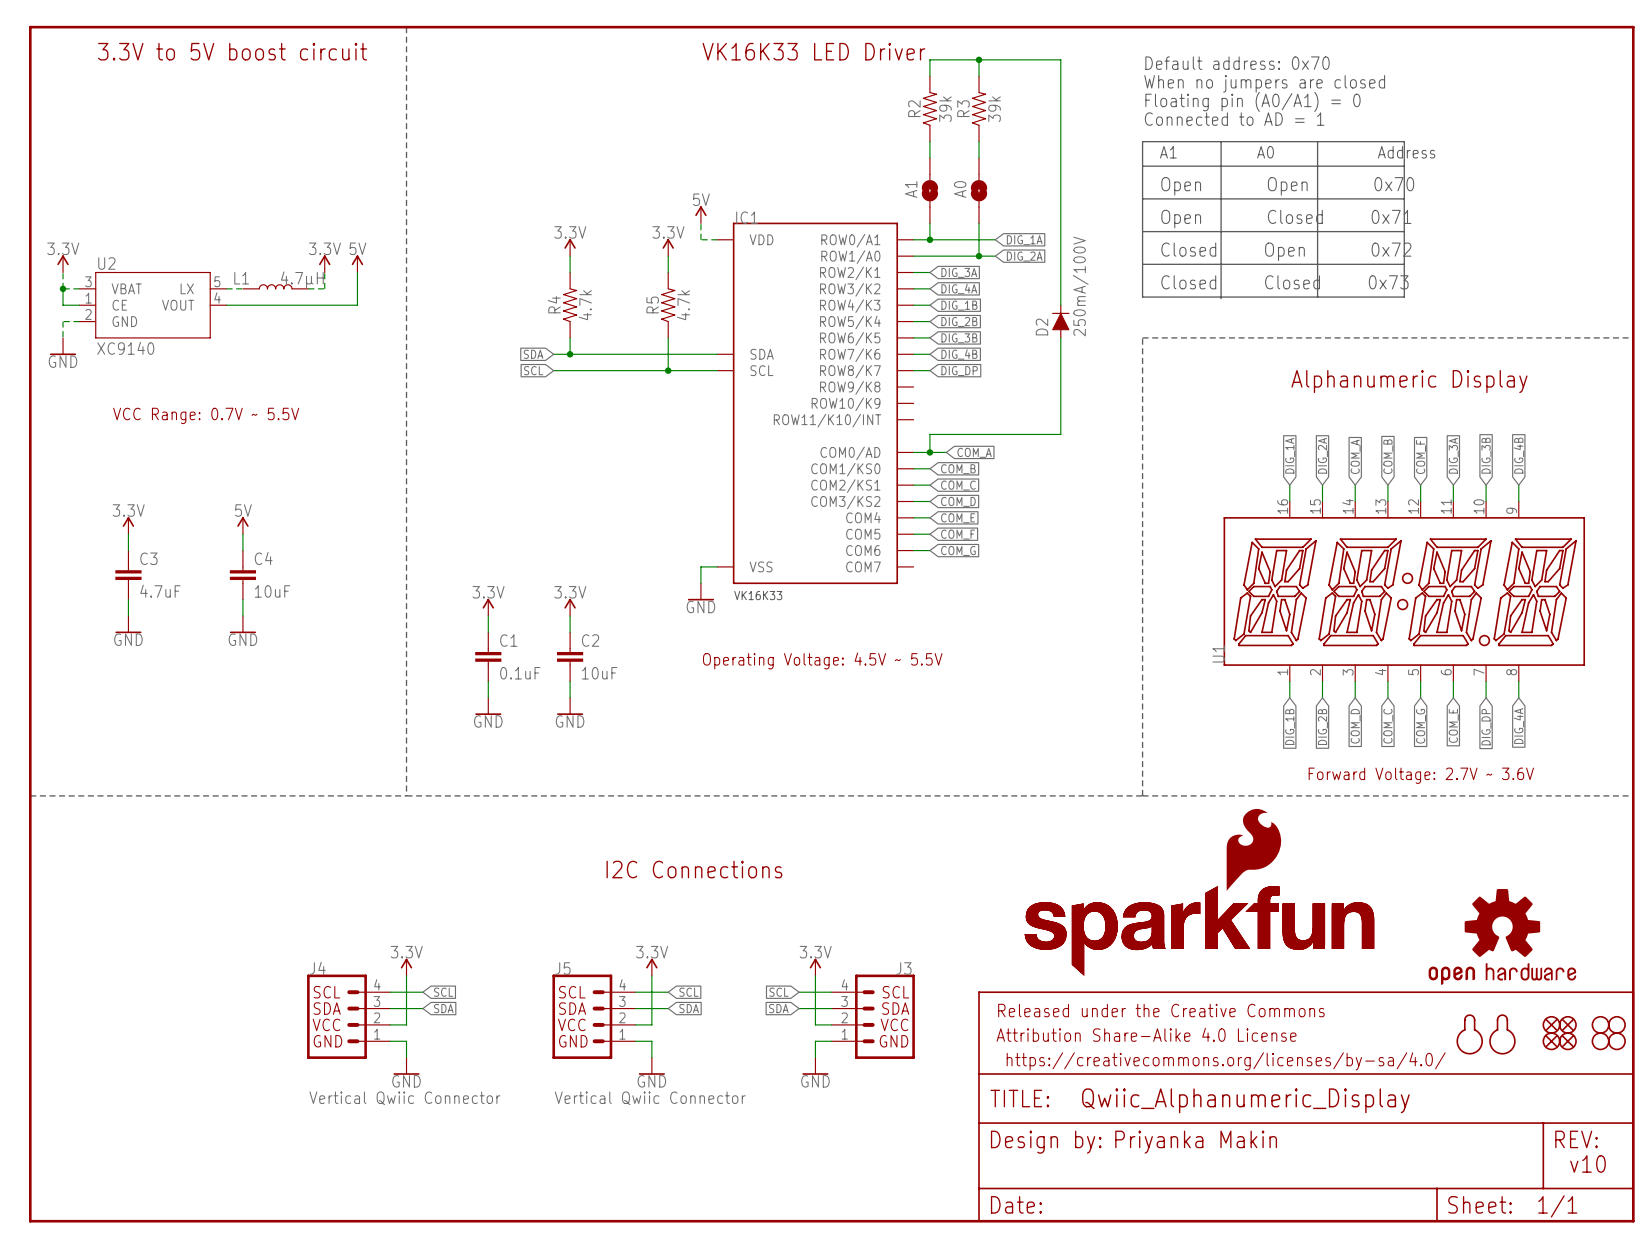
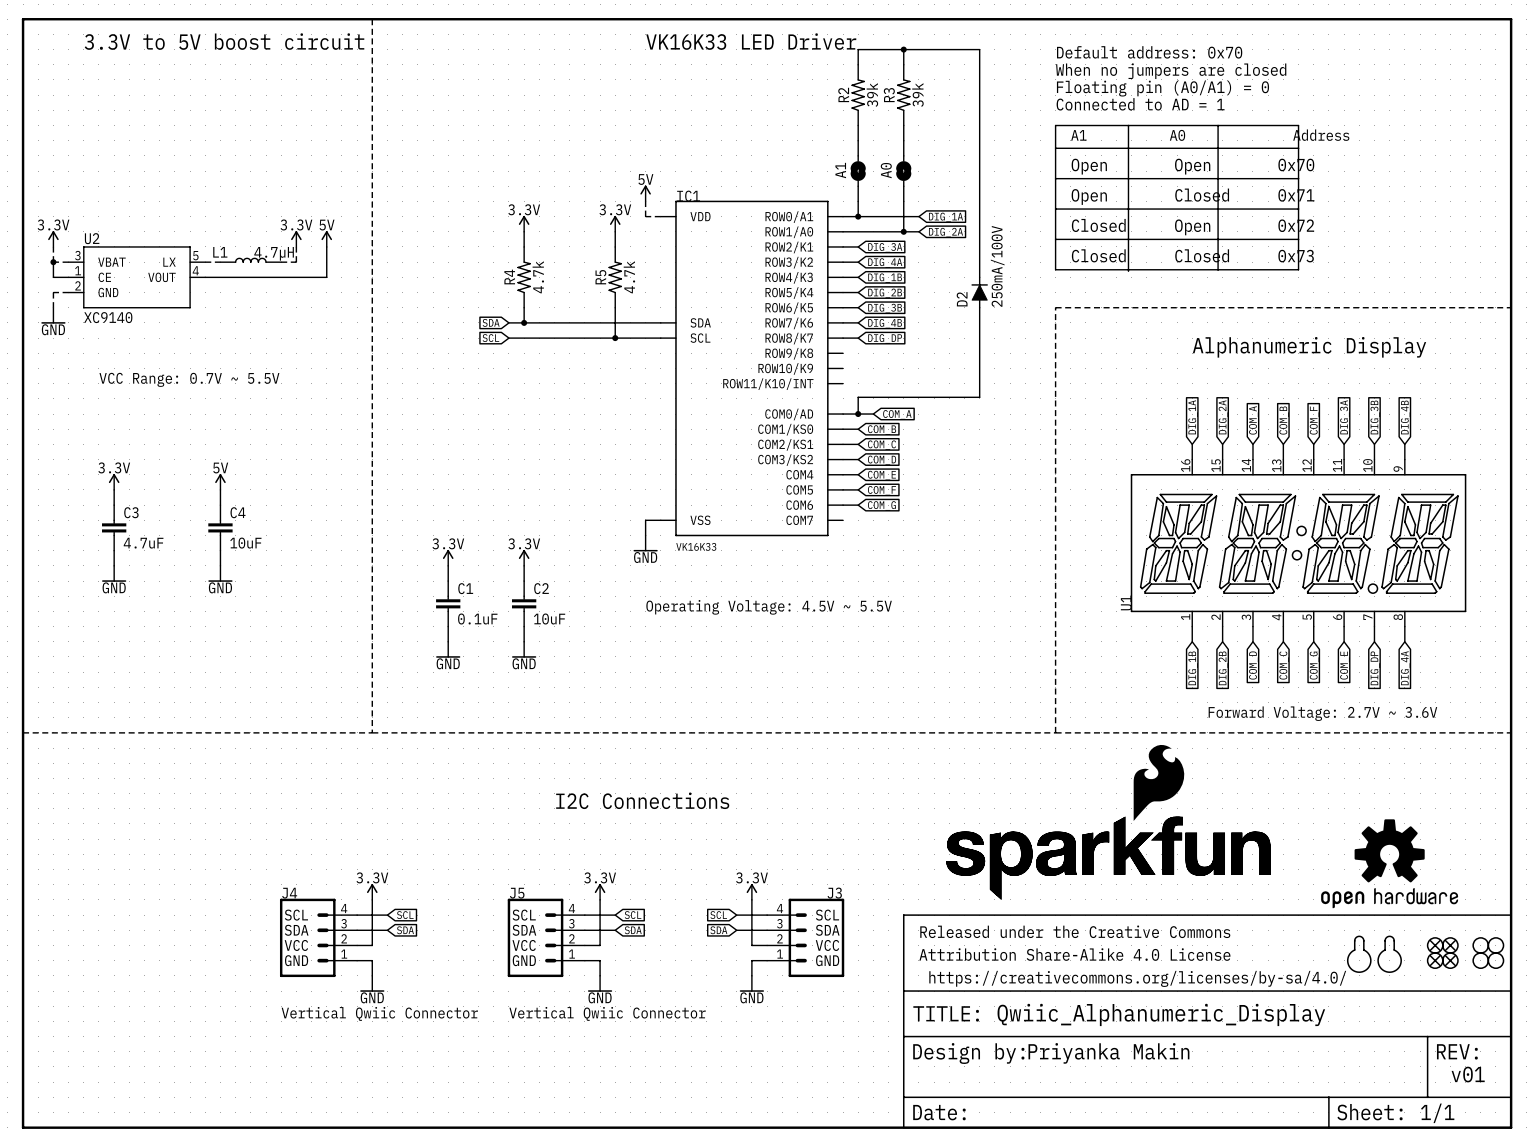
text: v10 (1587, 1163) -> v01 (1468, 1074)

